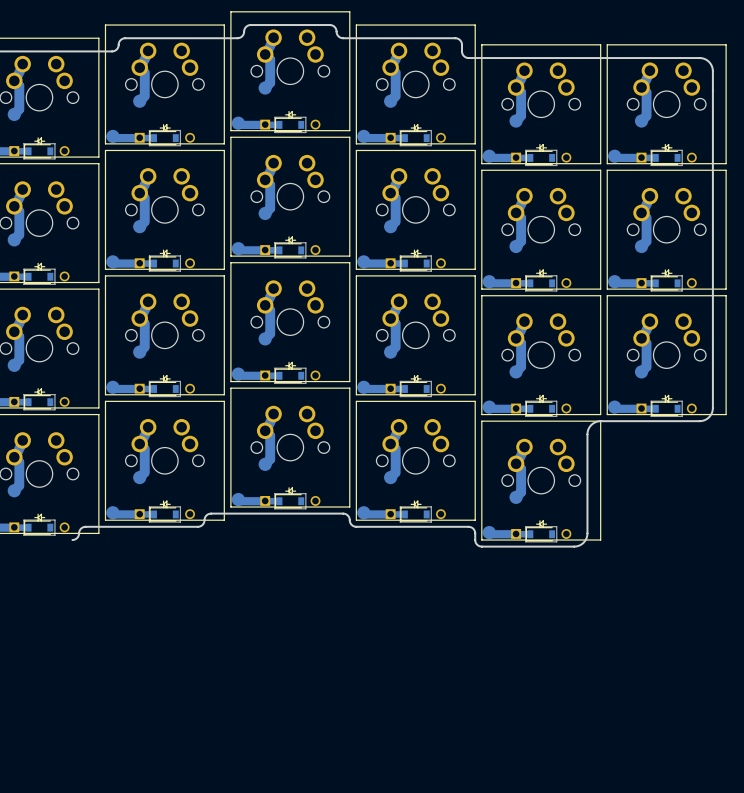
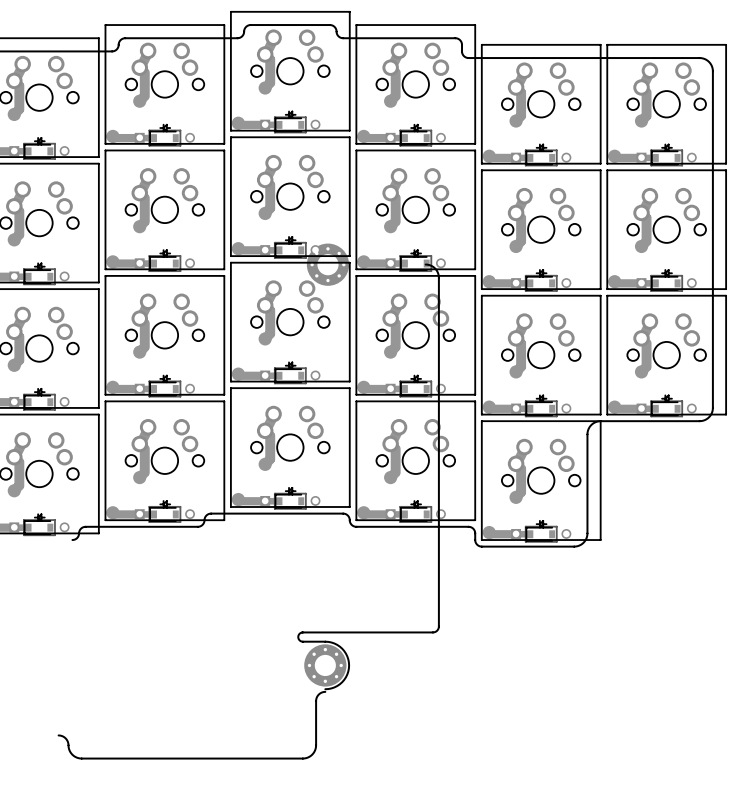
part: none -> (327, 264)
board edge: none -> (425, 264) (435, 268) (438, 277) (438, 628) (432, 632) (302, 632)
board edge: none -> (302, 632) (298, 635) (300, 641) (331, 642) (339, 646) (347, 656) (348, 668) (344, 679) (337, 686) (325, 689)
part: none -> (325, 665)
board edge: none -> (325, 691) (319, 693) (316, 699) (315, 748) (312, 754) (304, 758) (79, 758) (71, 753) (65, 738) (58, 735)

